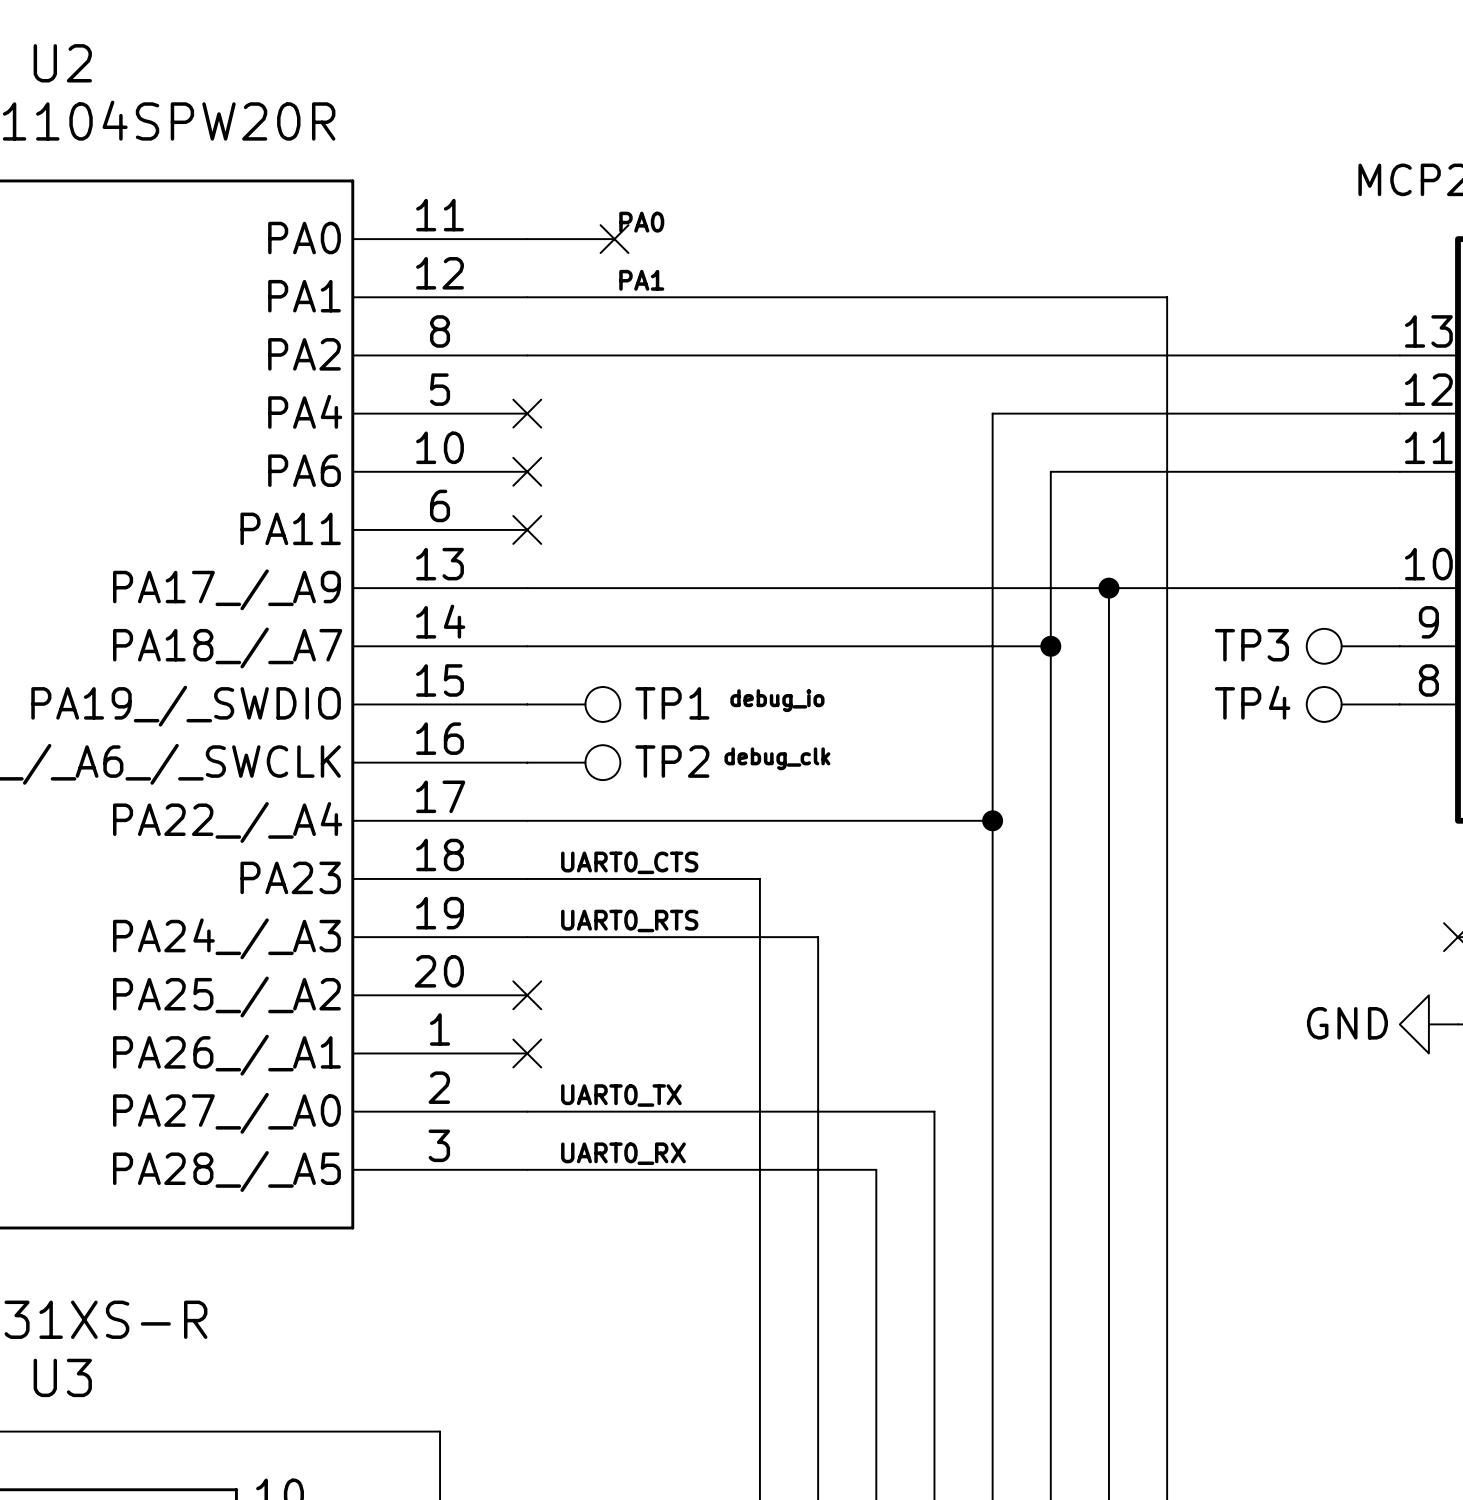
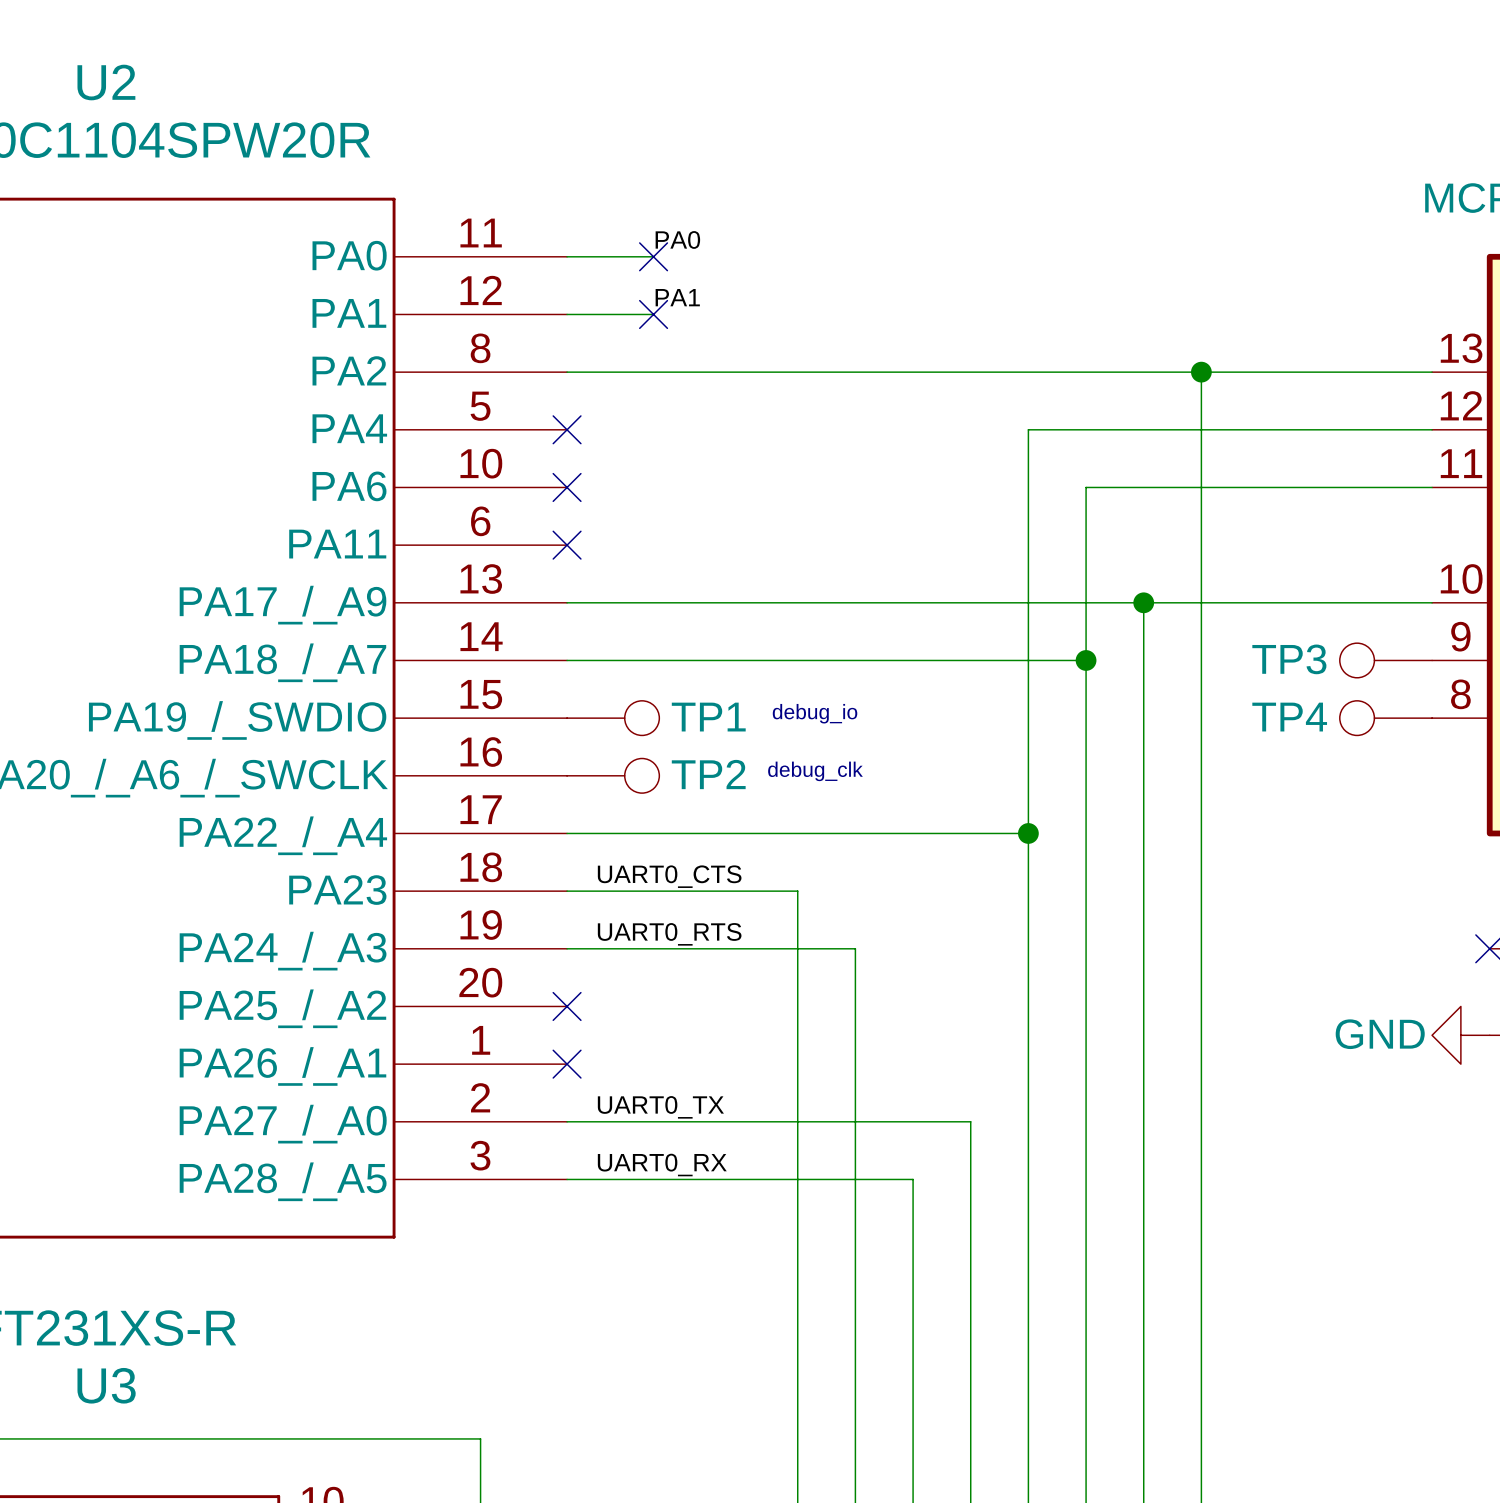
wire: (614, 297) (1167, 297) (1167, 355) -> none
no-connect mark: none -> (653, 314)
junction: none -> (1201, 372)

